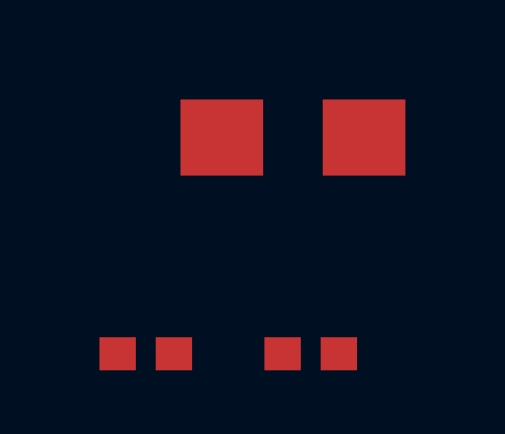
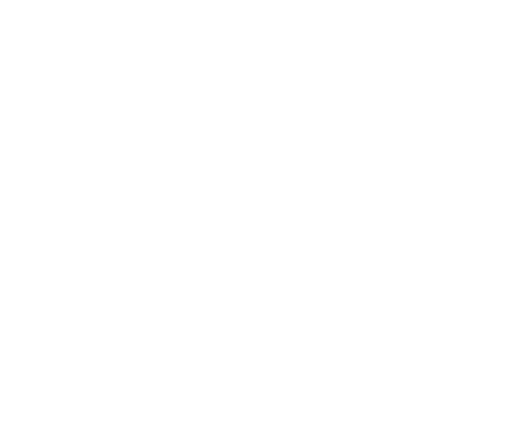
part: (292, 137) -> none
part: (145, 353) -> none
part: (310, 353) -> none

